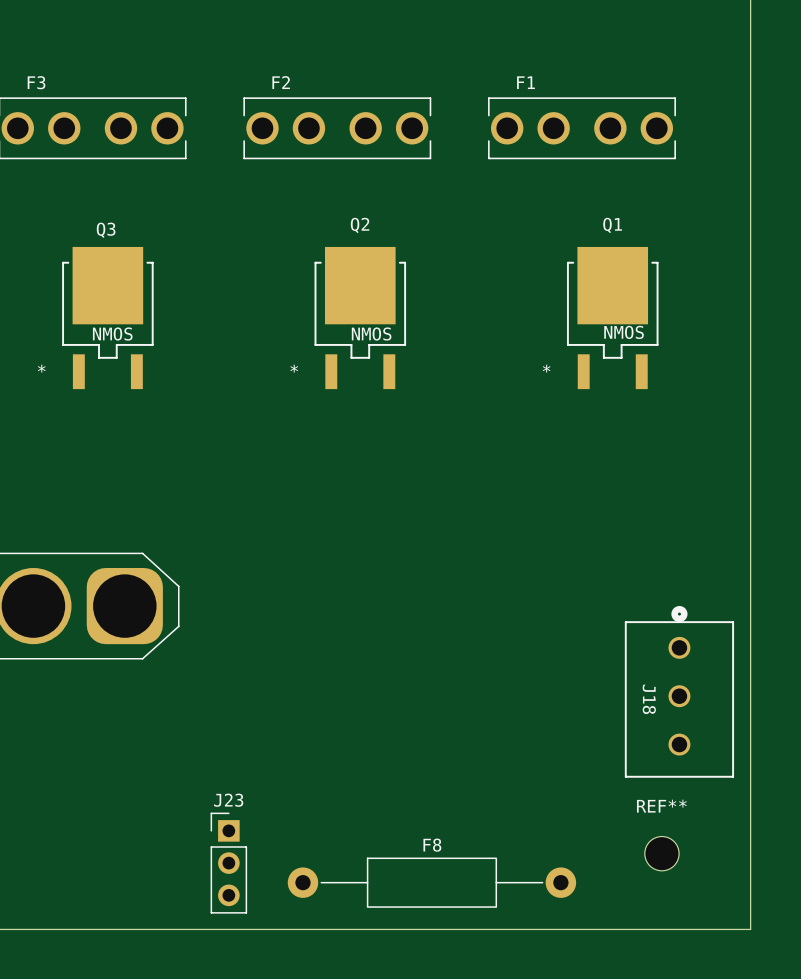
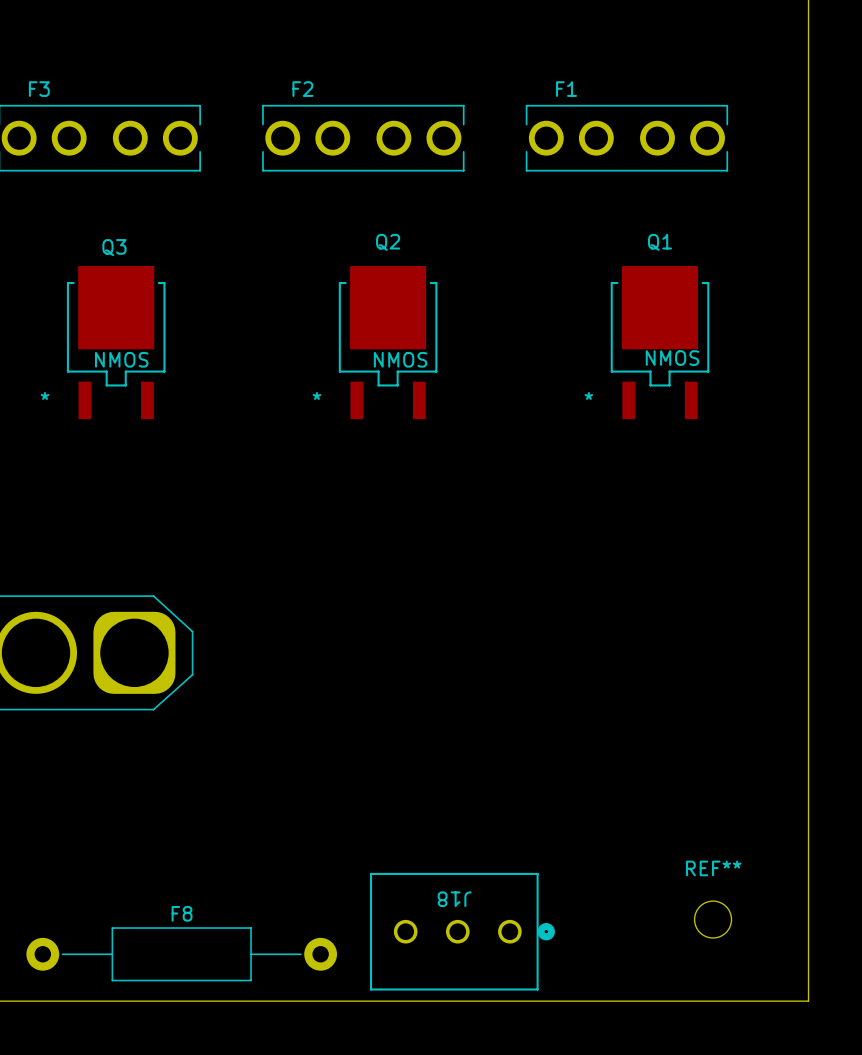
J18 rotation: 0° (679, 691) -> 90° clockwise (462, 931)
J18 position: (679, 691) -> (462, 931)
J23: (228, 863) -> none
F8 position: (431, 882) -> (181, 954)

